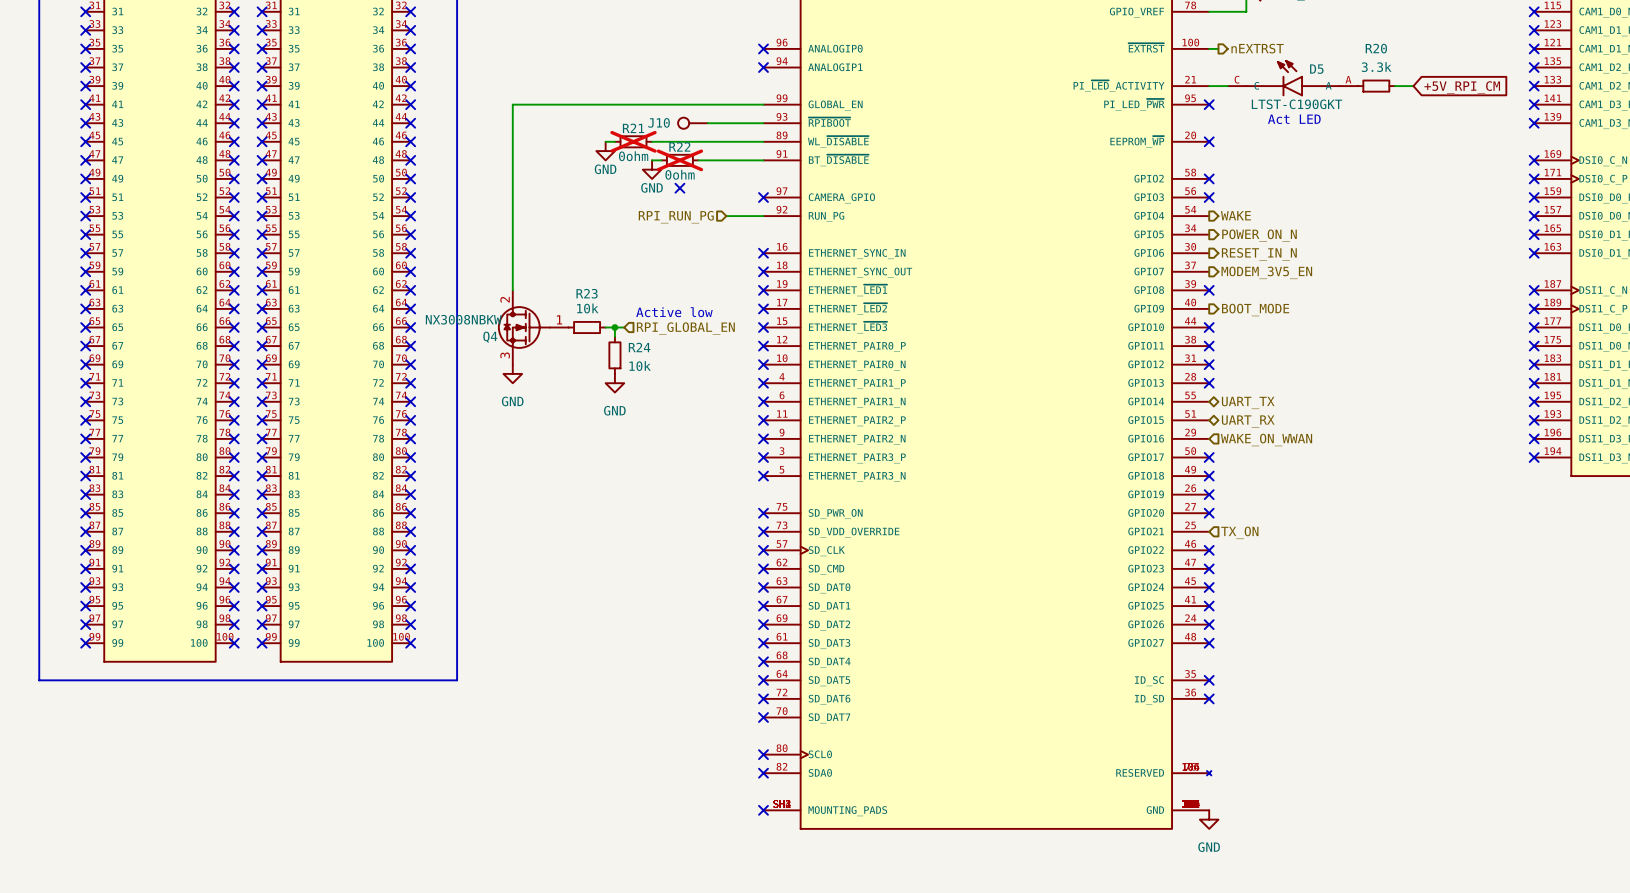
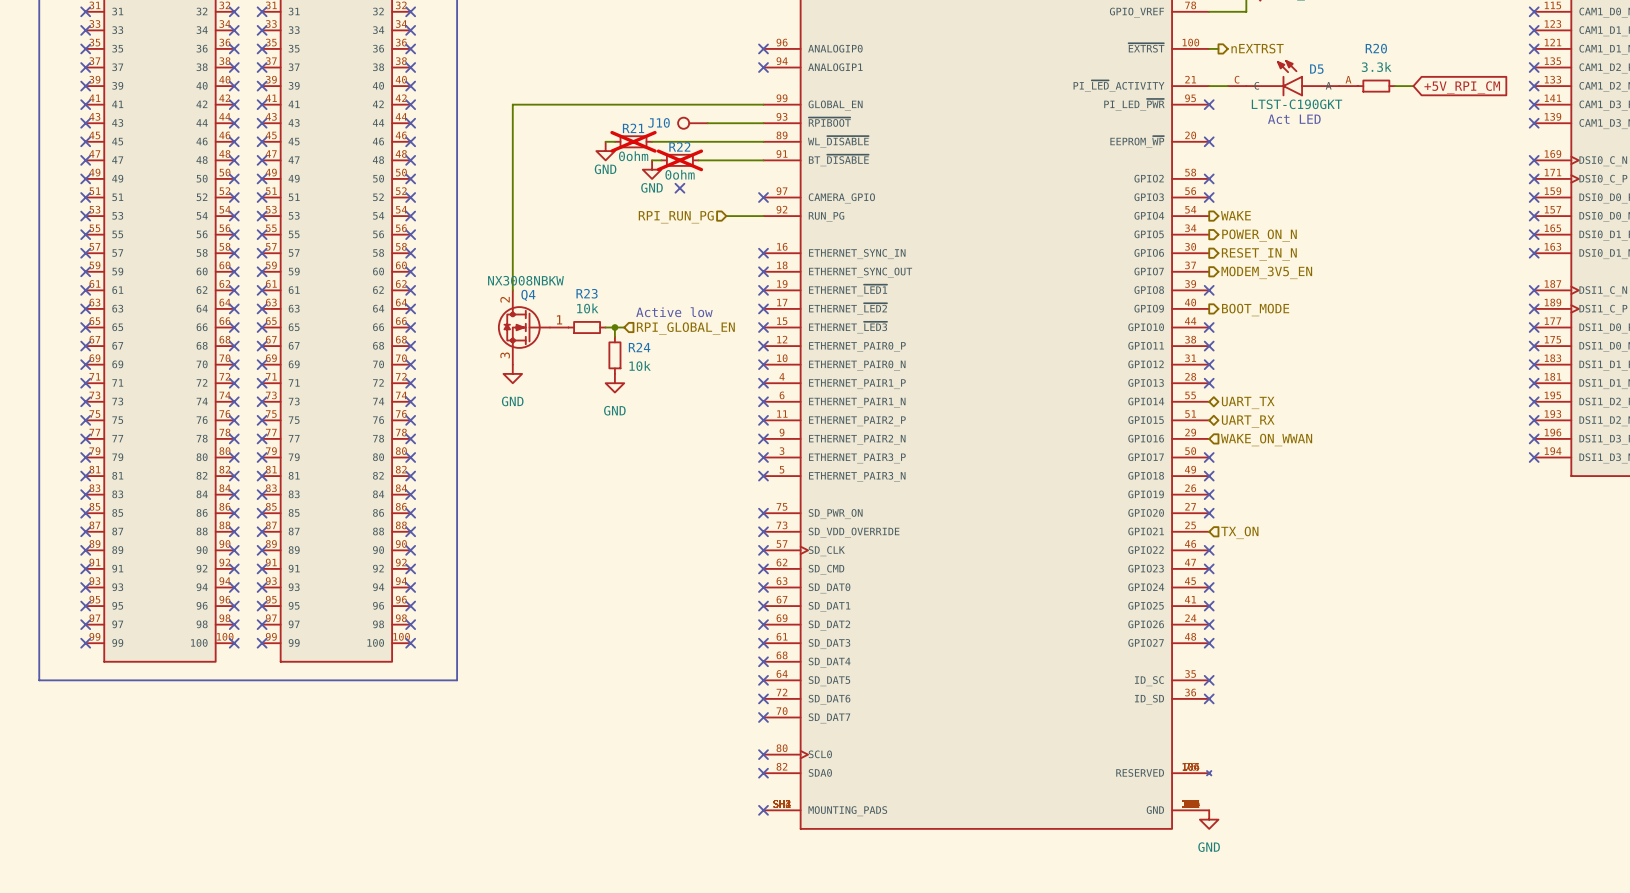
Q4 value position: NX3008NBKW (463, 319) -> NX3008NBKW (525, 280)
Q4 name position: Q4 (490, 337) -> Q4 (528, 295)

